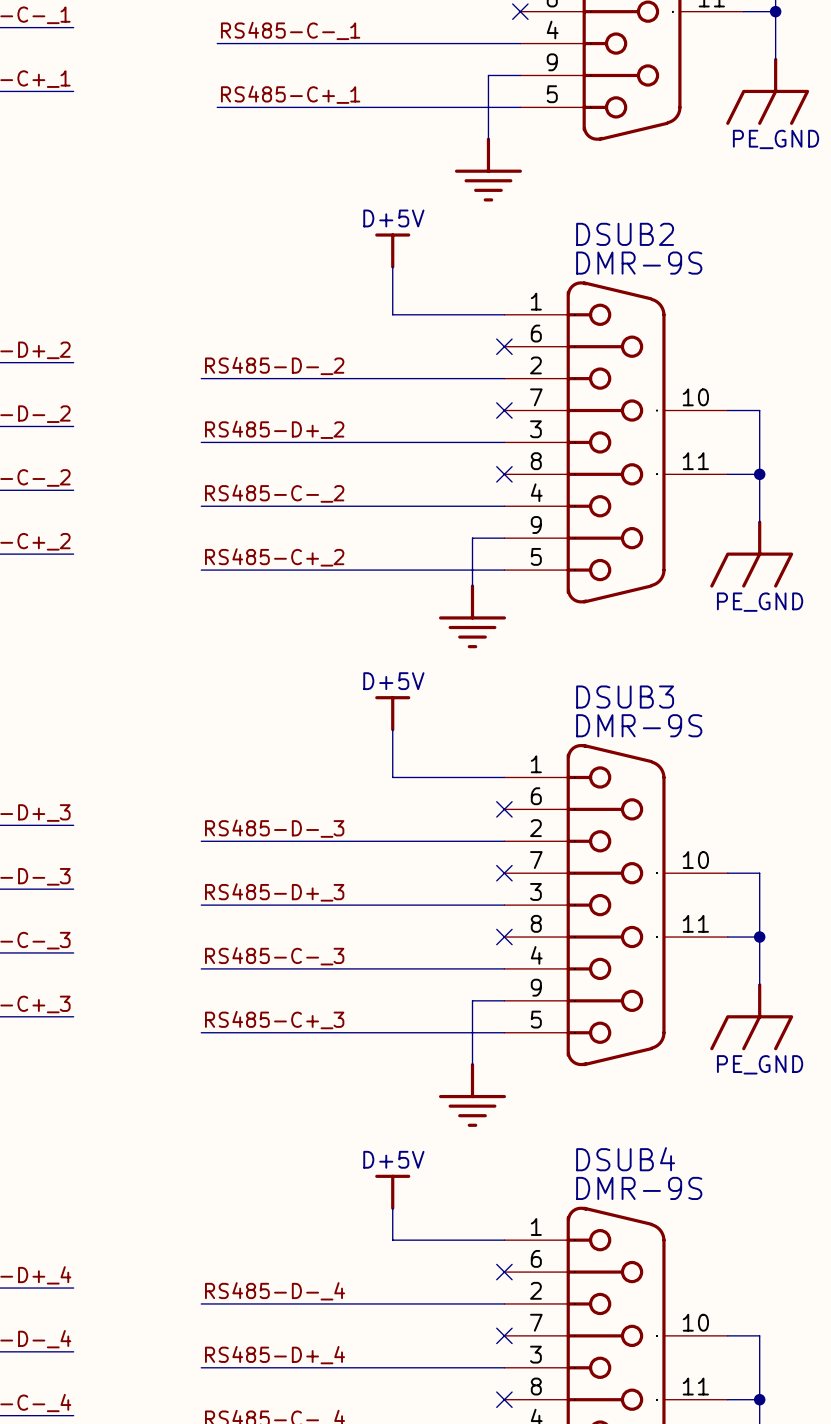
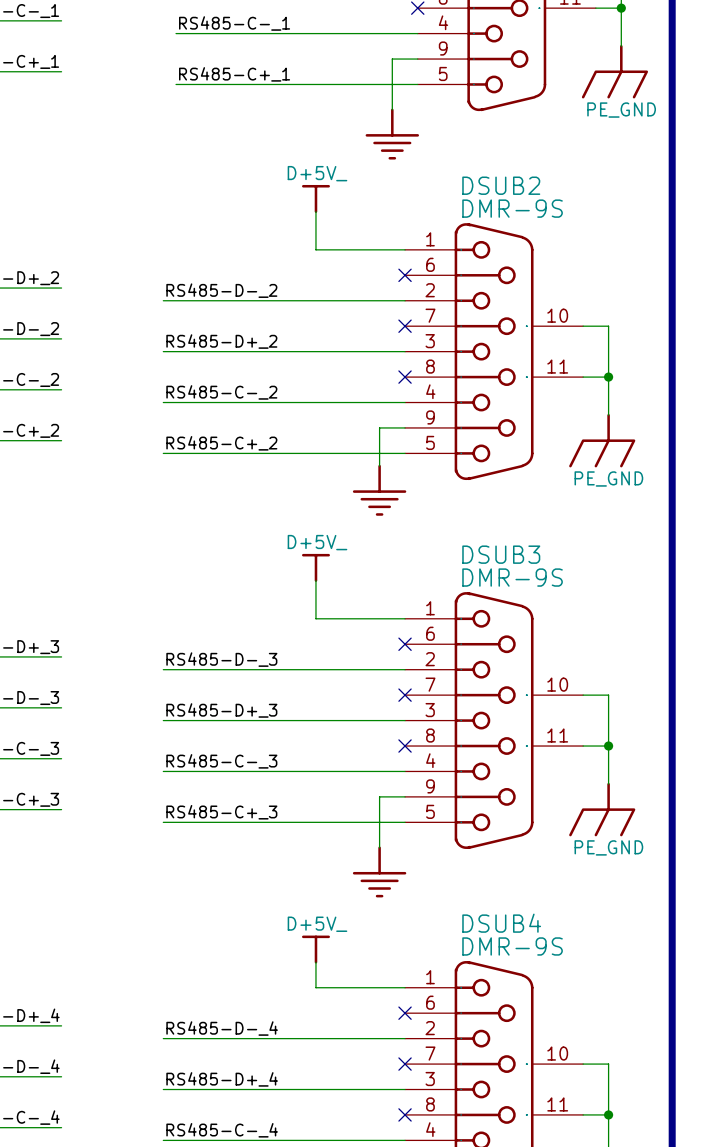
power symbol: D+5V (392, 250) -> D+5V_ (315, 198)
power symbol: D+5V (392, 713) -> D+5V_ (315, 567)
power symbol: D+5V (392, 1192) -> D+5V_ (315, 949)

